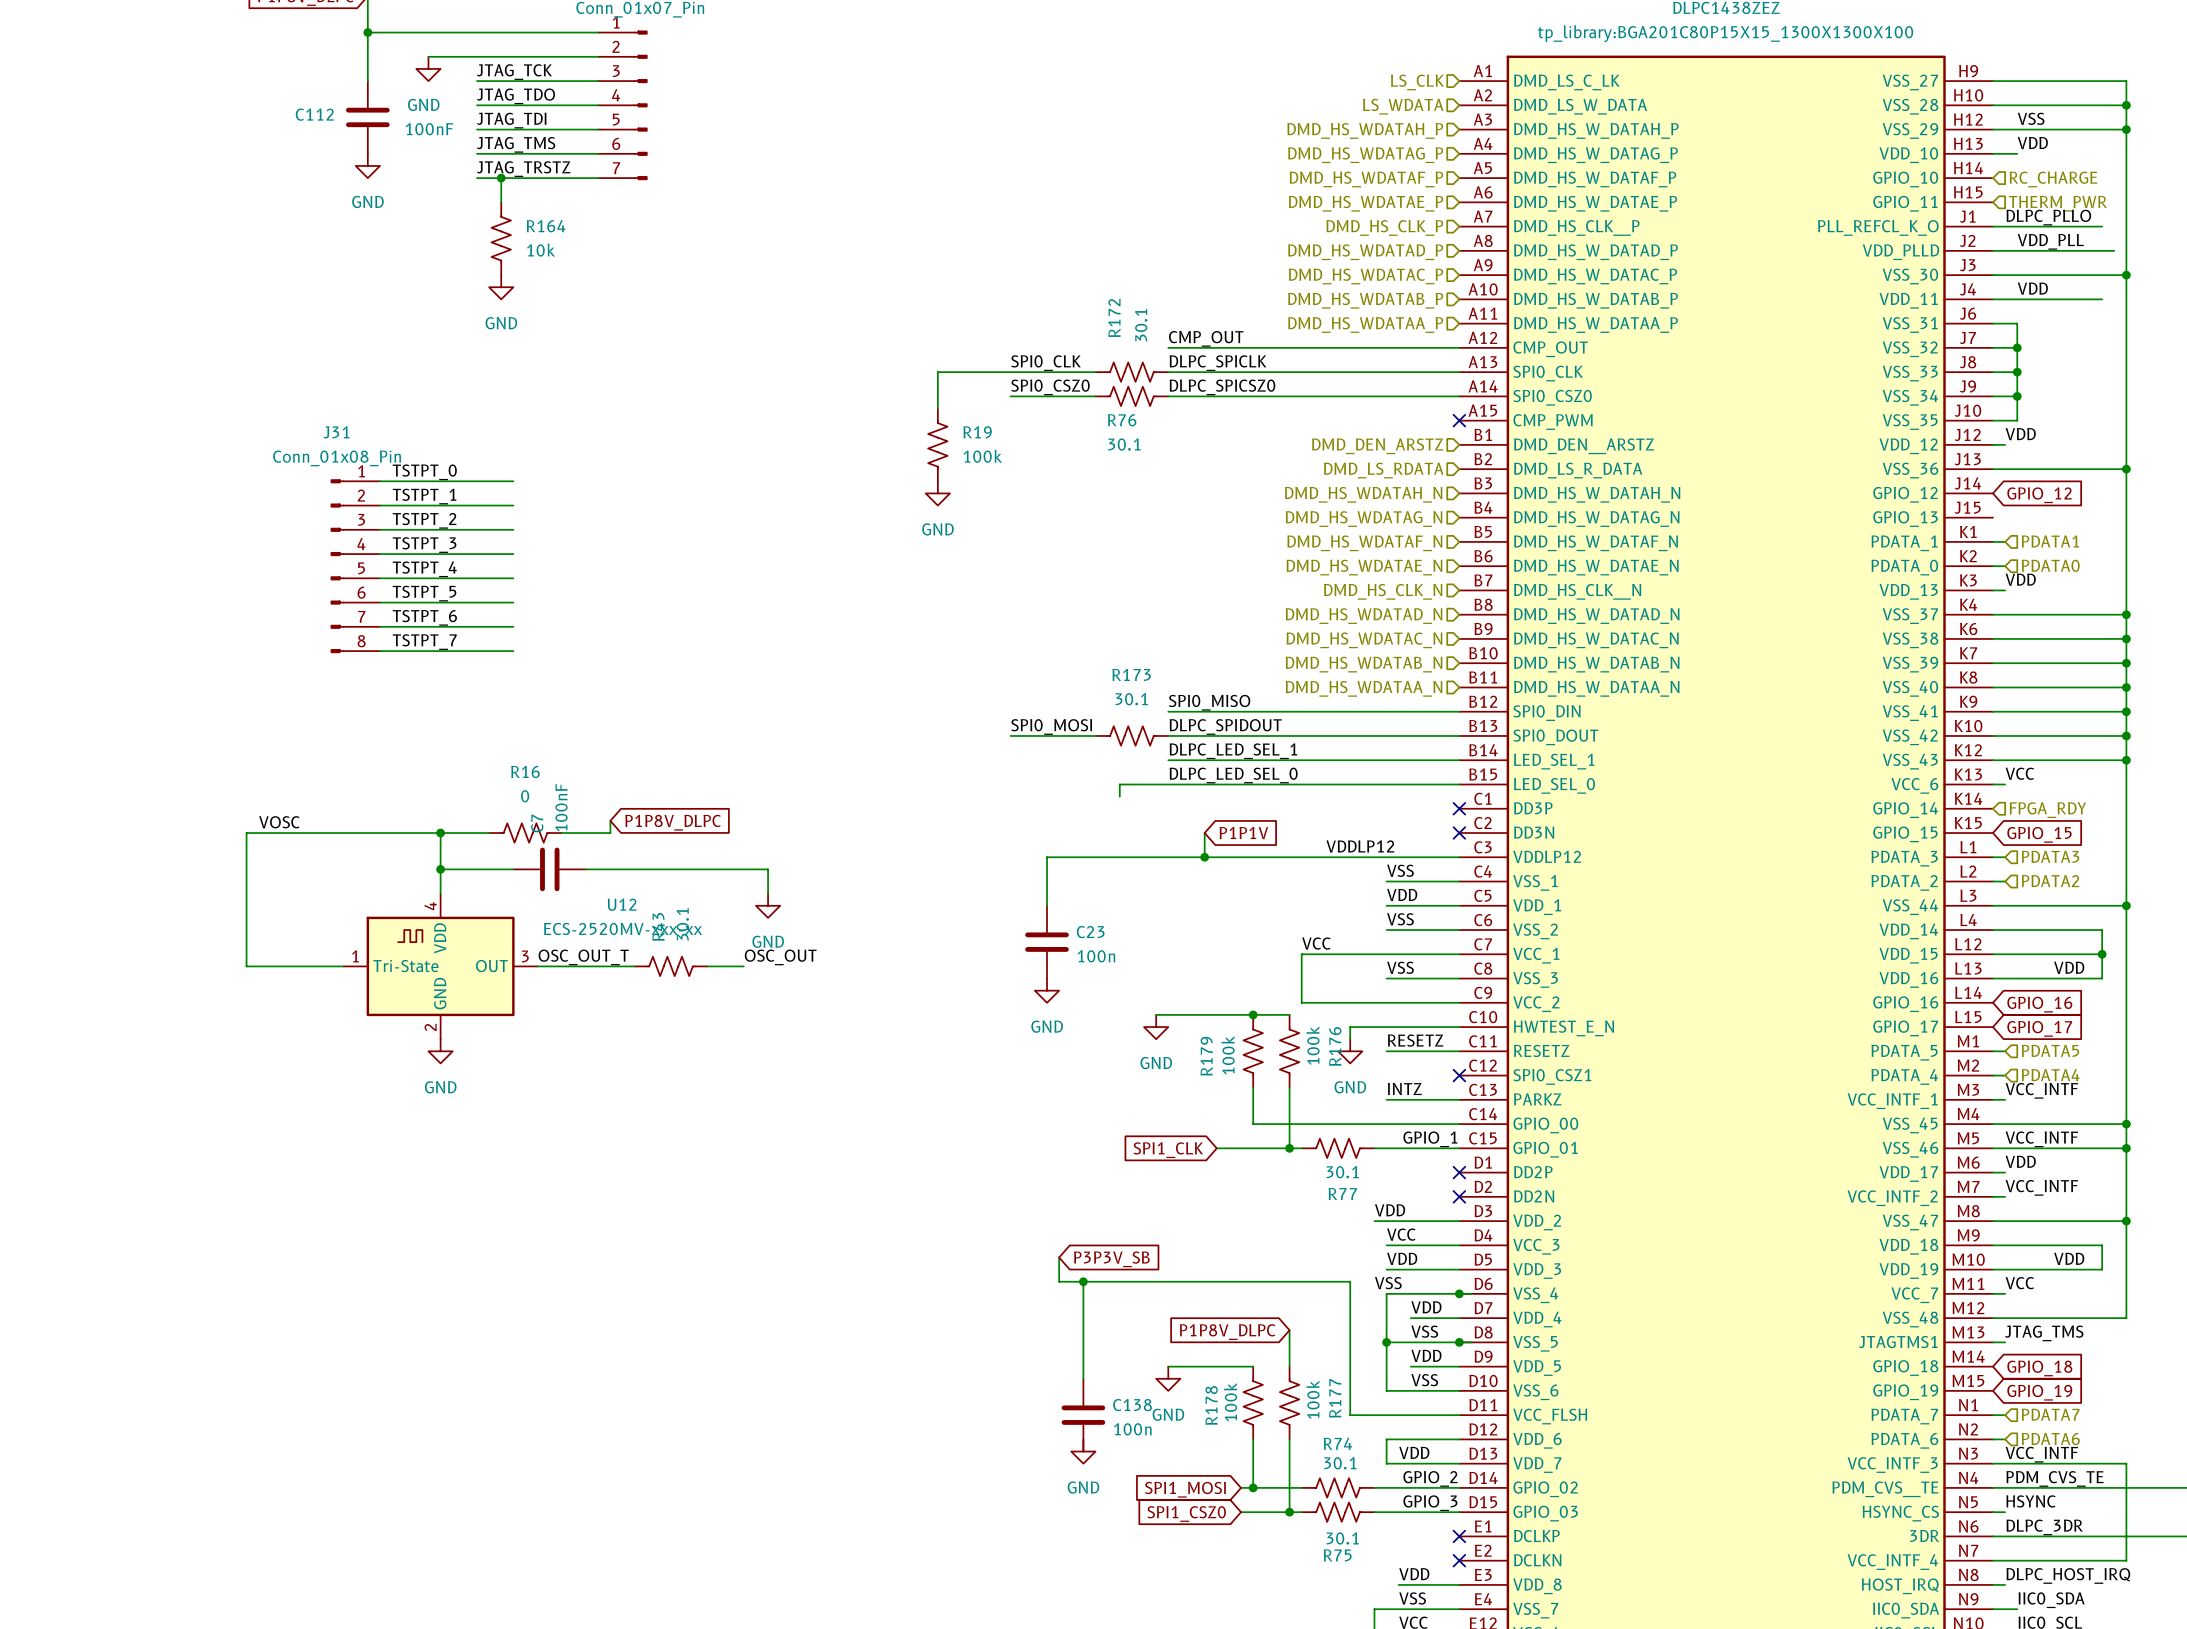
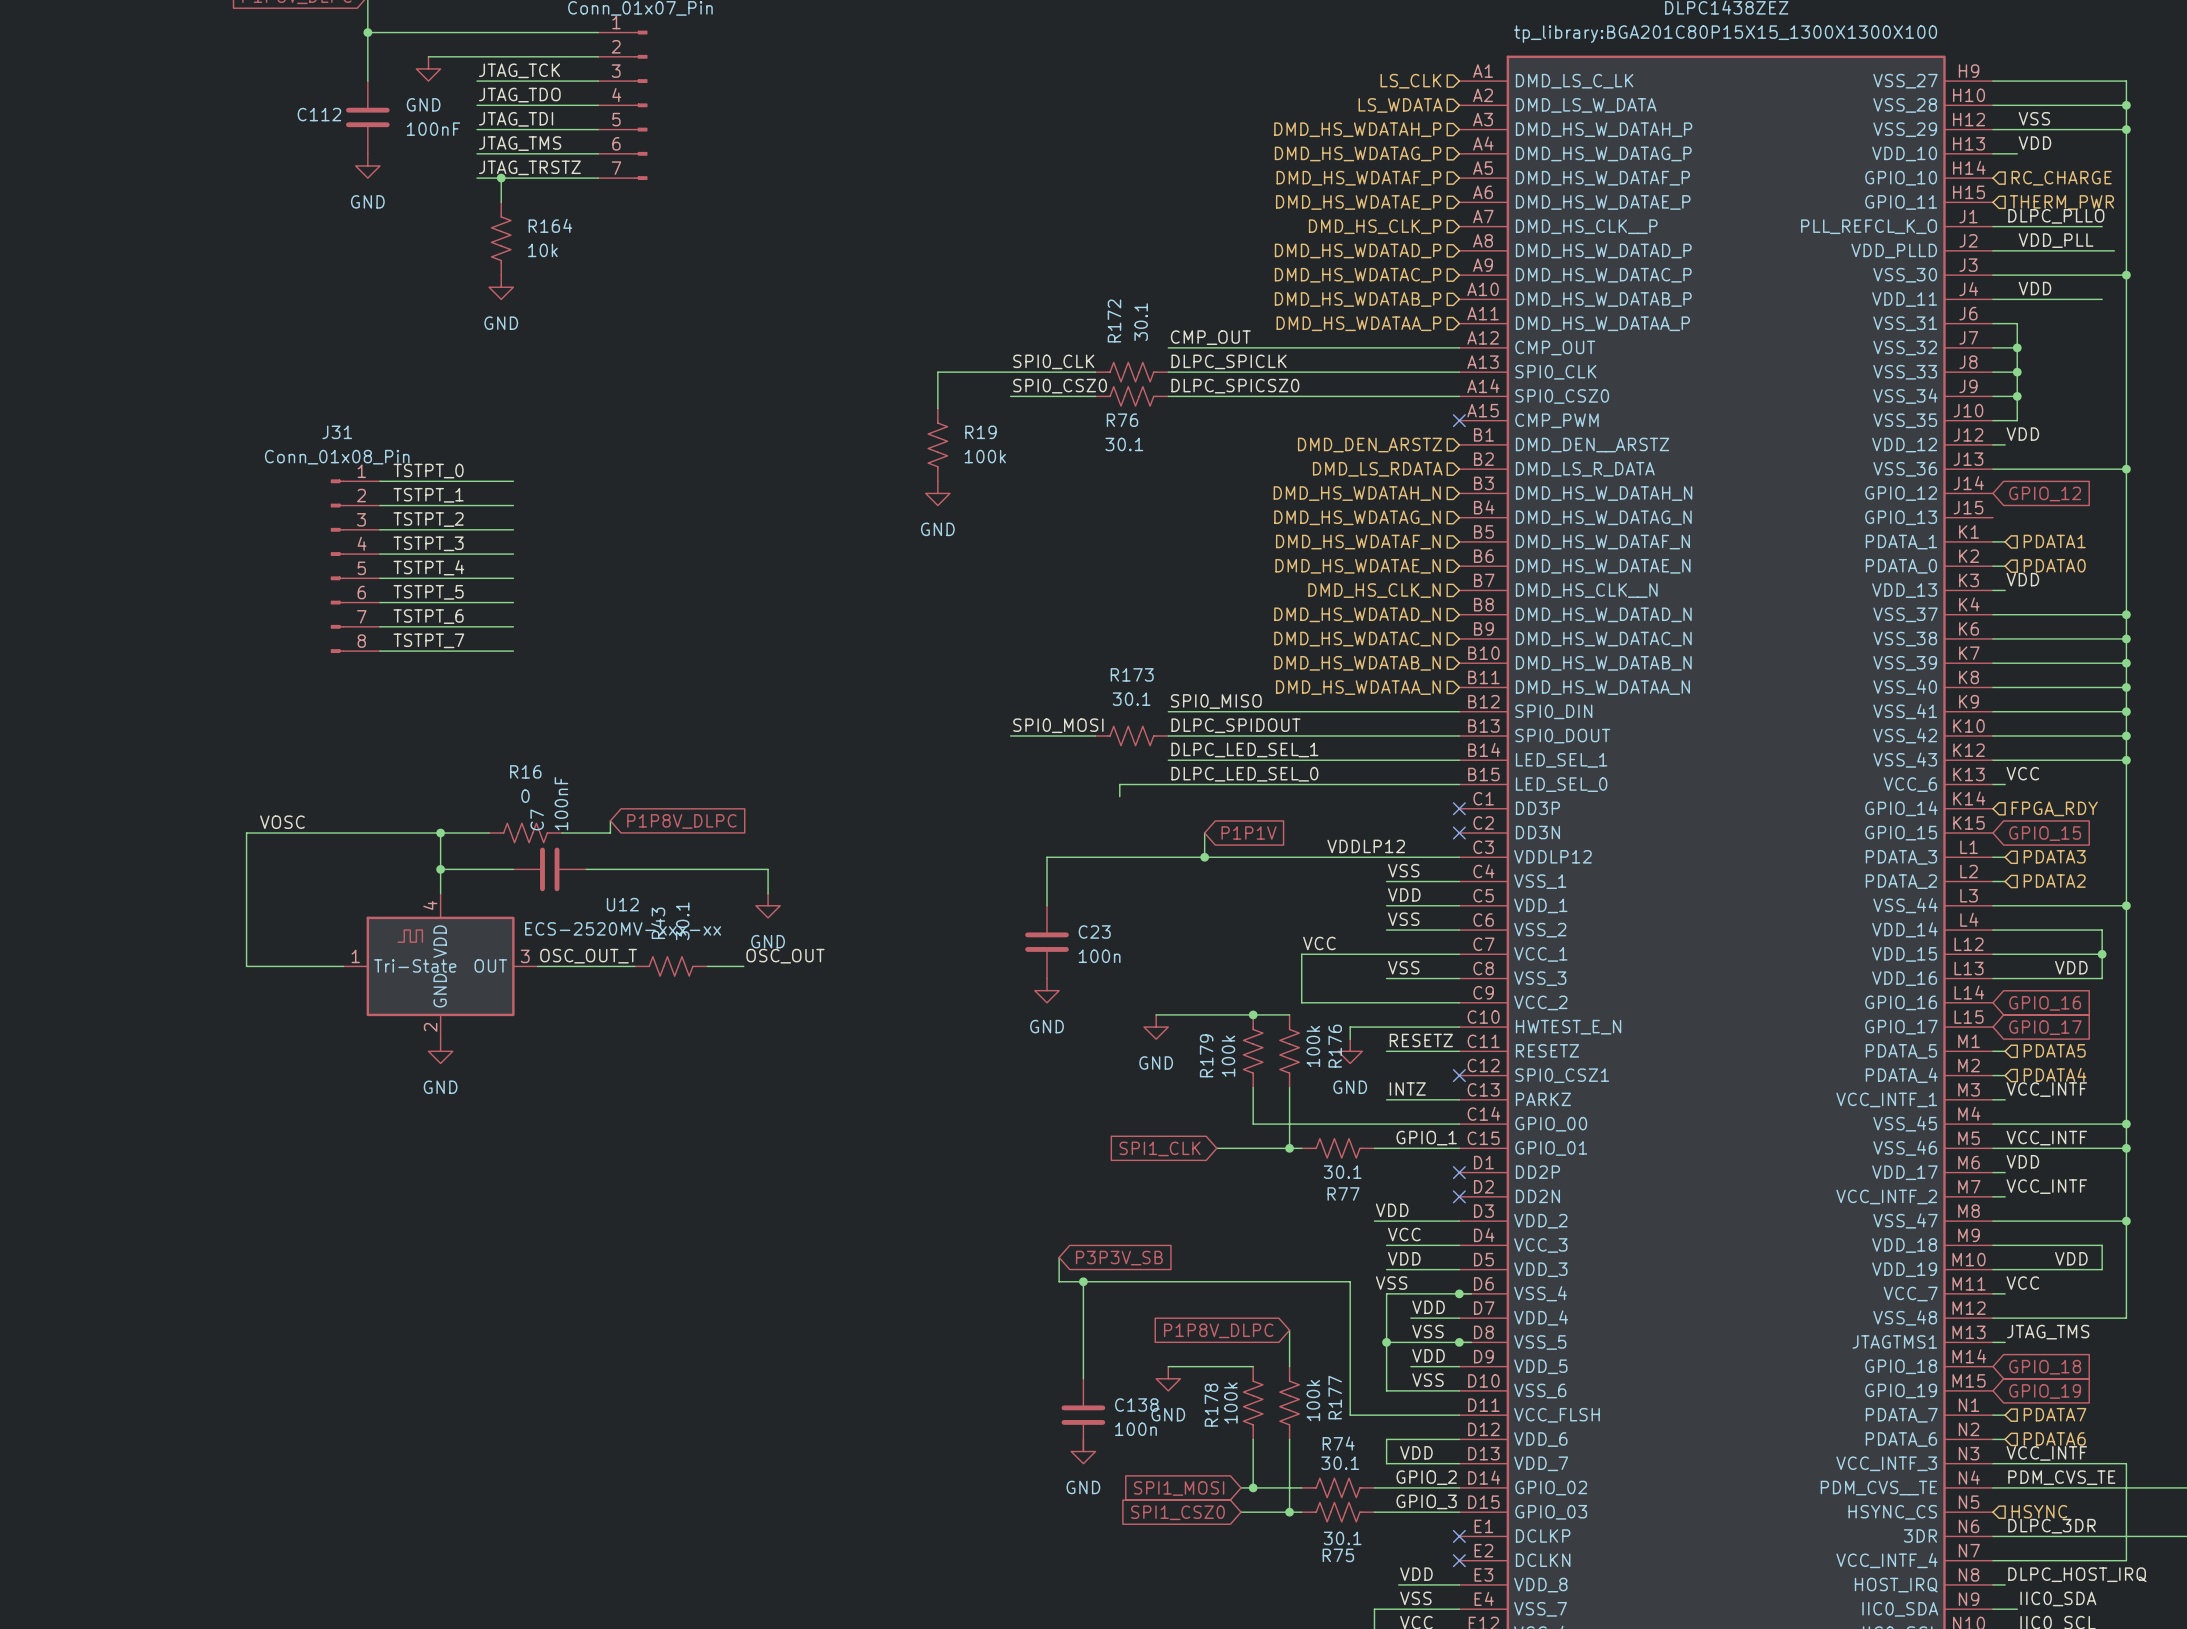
label: HSYNC (2030, 1501) -> none
hierarchical label: none -> HSYNC (2039, 1511)
wire: (1993, 1512) (2005, 1512) -> none

